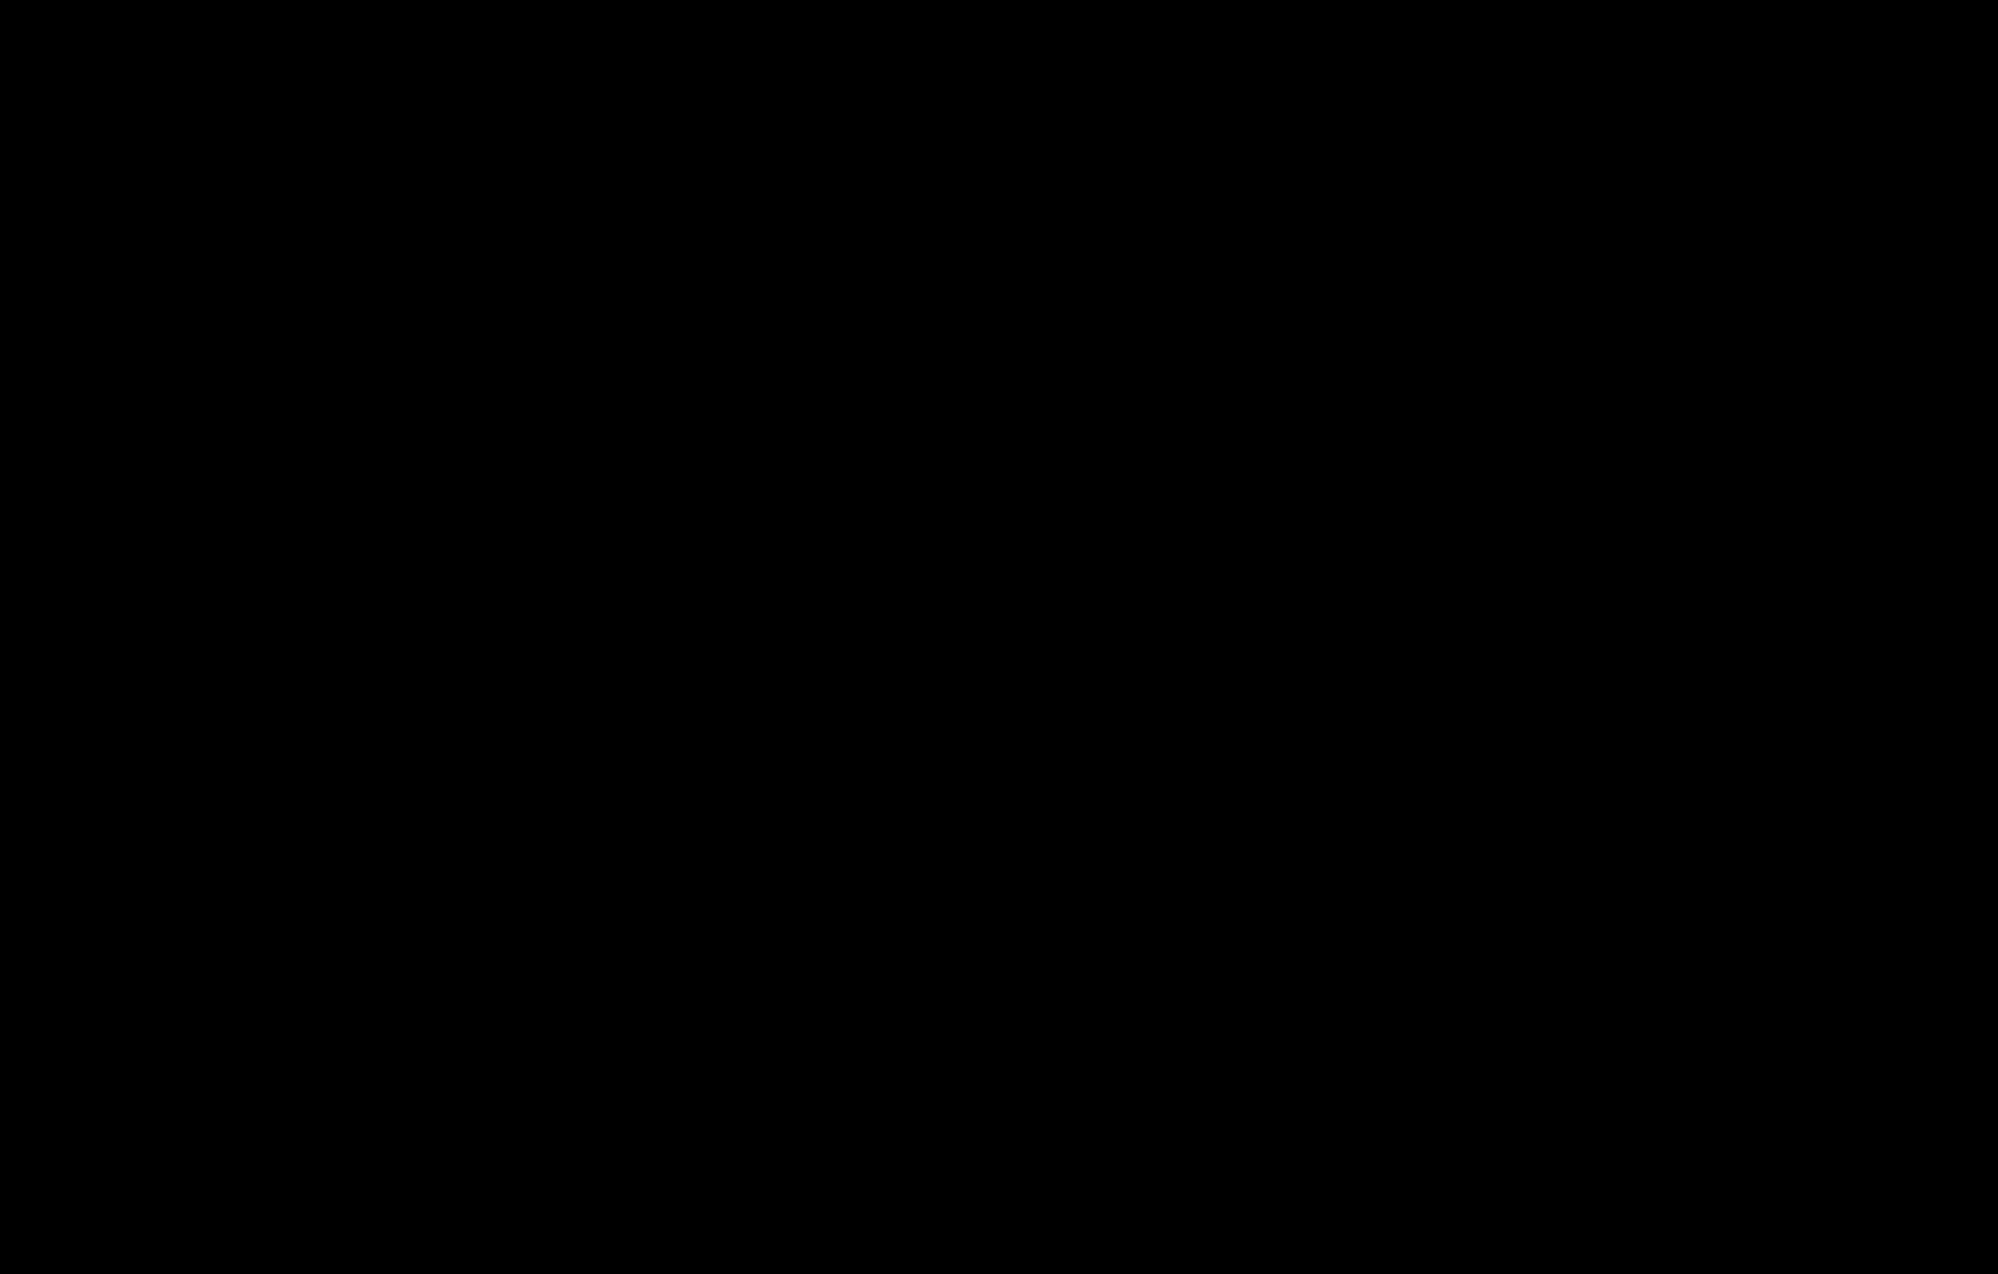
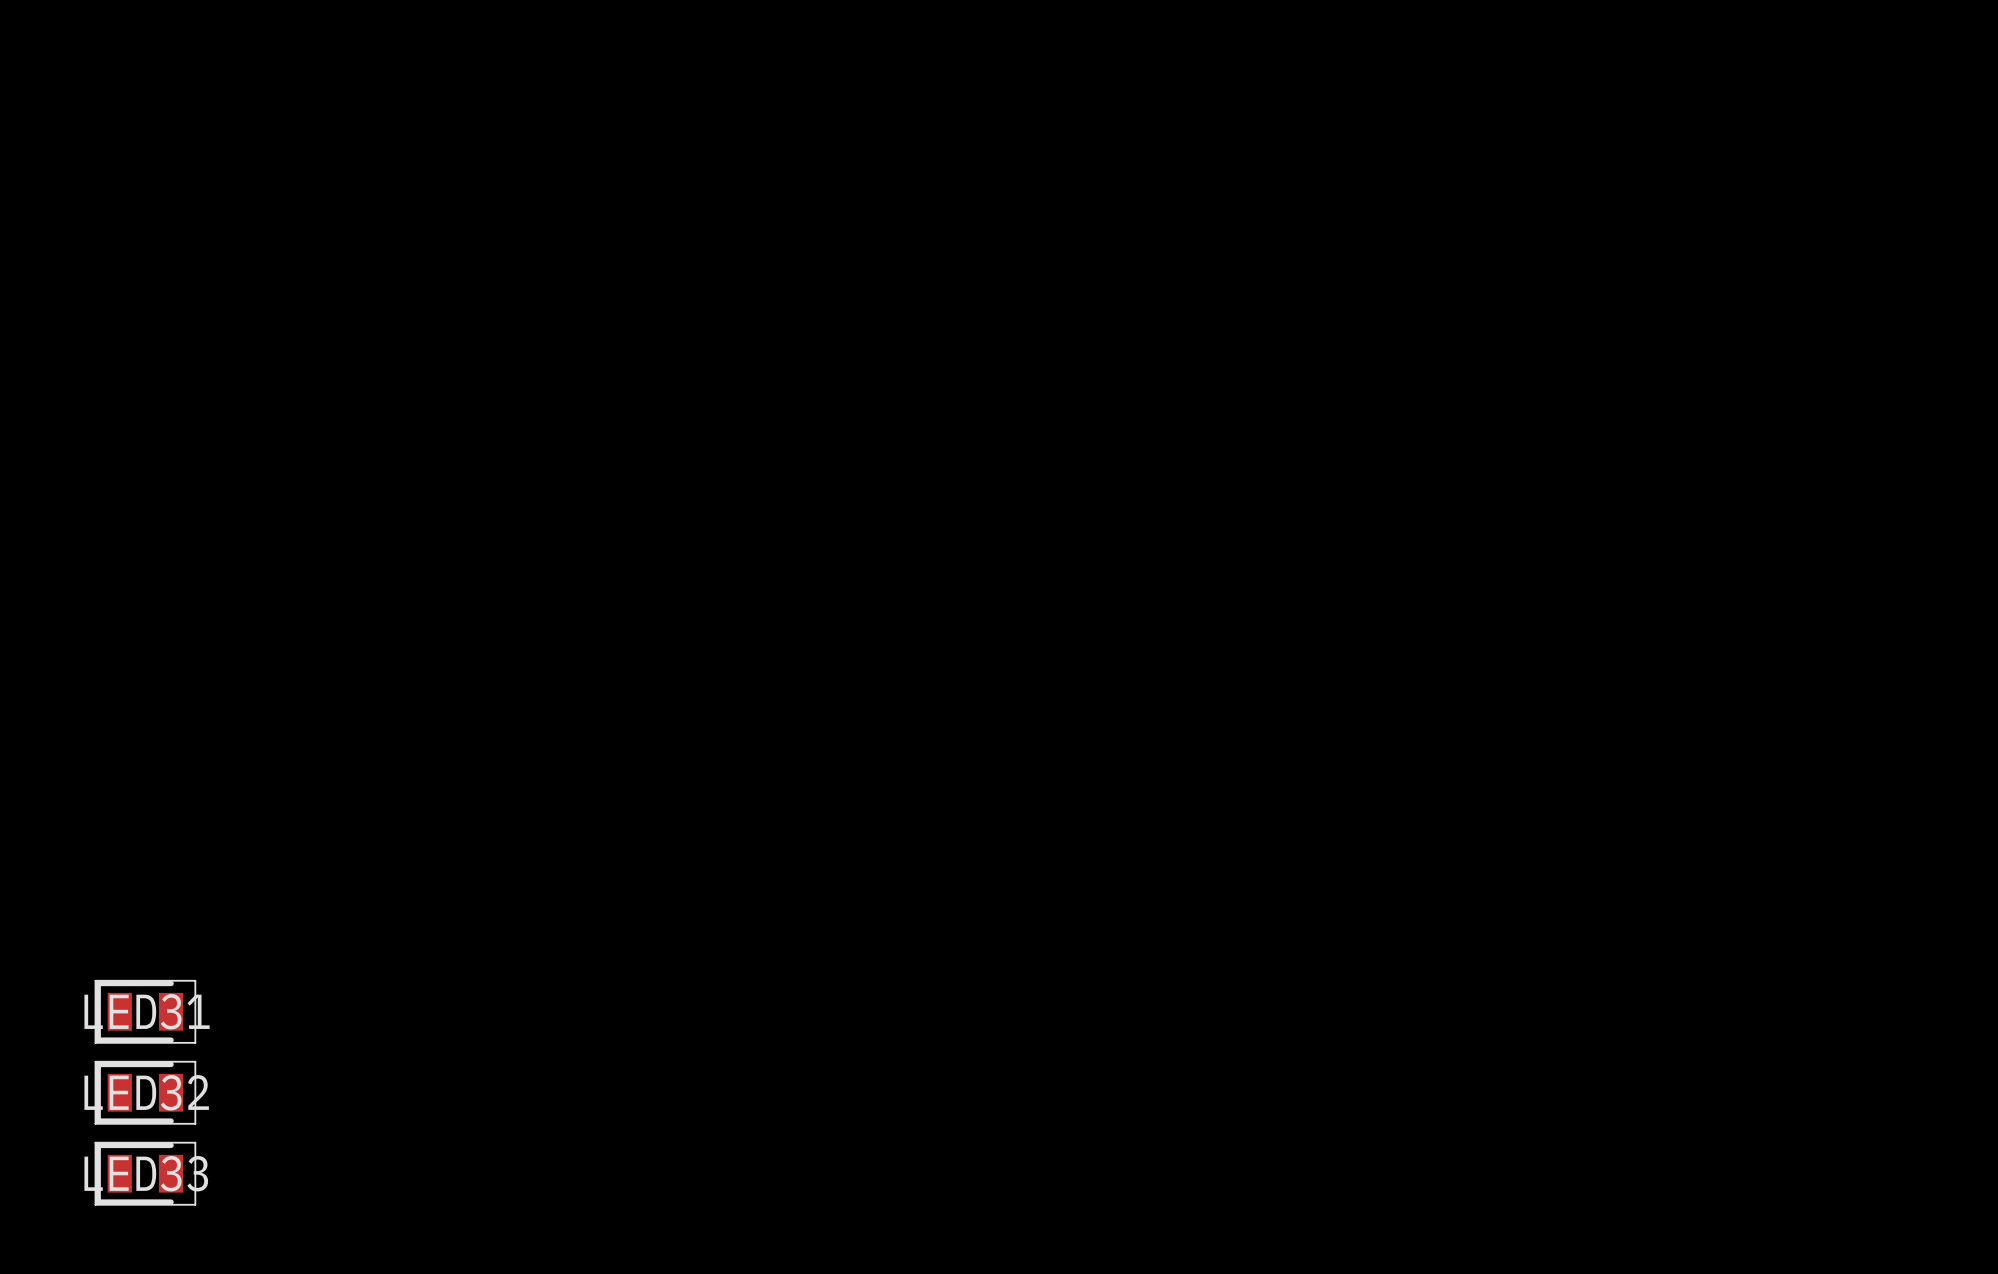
LED31: none -> (145, 1011)
LED32: none -> (145, 1092)
LED33: none -> (145, 1173)

